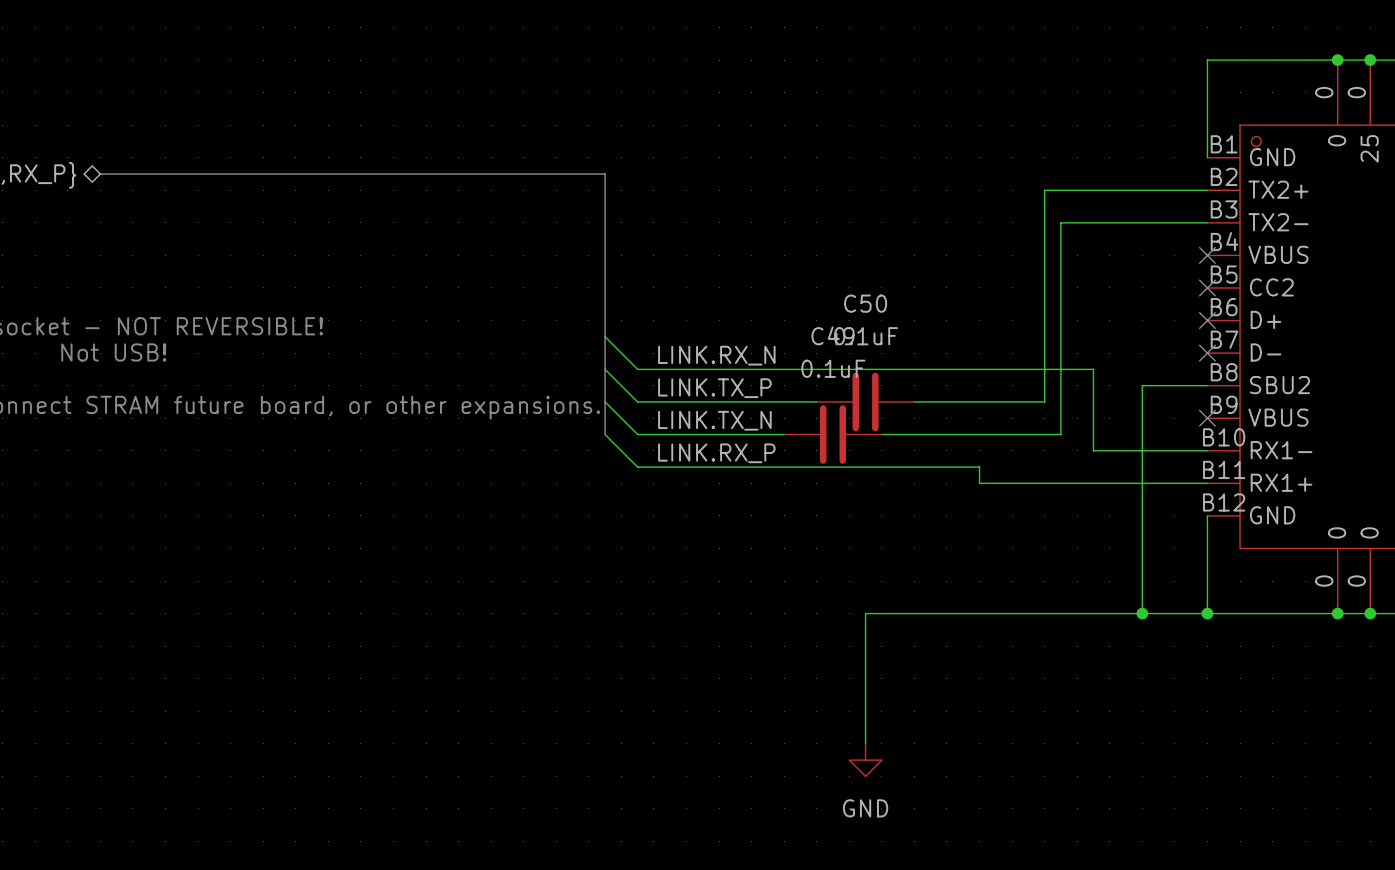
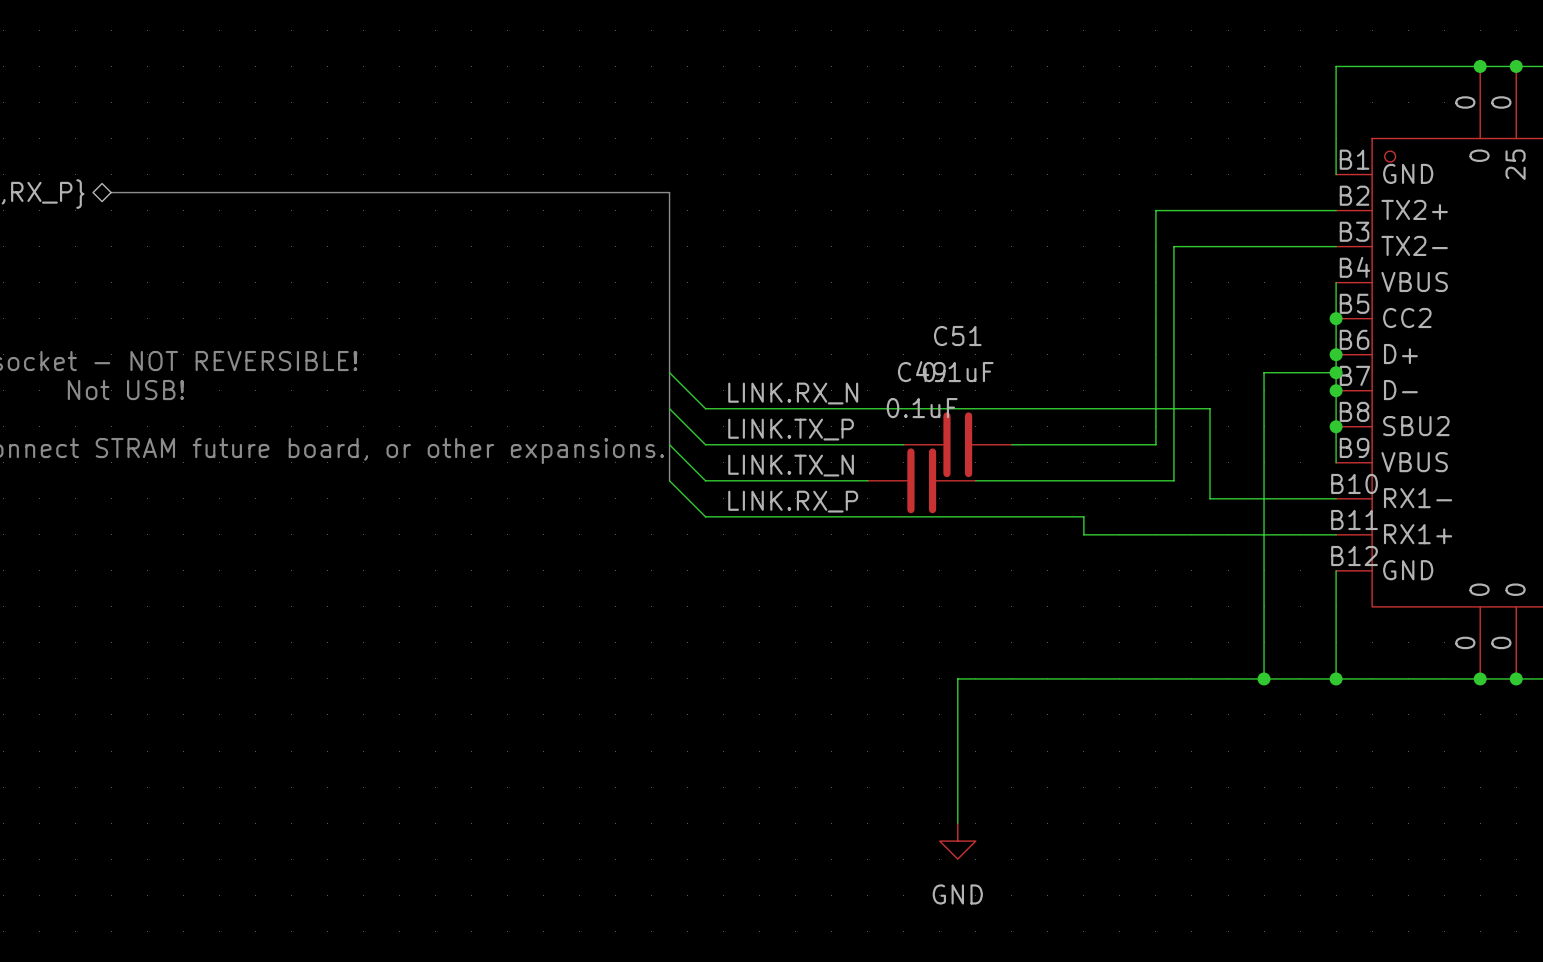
wire: none -> (1336, 282) (1336, 462)
no-connect mark: (1207, 255) -> none
no-connect mark: (1207, 287) -> none
junction: none -> (1336, 318)
C50 name: C50 (865, 303) -> C51 (957, 336)
no-connect mark: (1207, 320) -> none
junction: none -> (1336, 354)
junction: none -> (1336, 372)
no-connect mark: (1207, 353) -> none
junction: none -> (1336, 390)
wire: (1142, 385) (1207, 385) -> (1264, 426) (1264, 372) (1336, 372)
junction: none -> (1336, 426)
no-connect mark: (1207, 418) -> none

